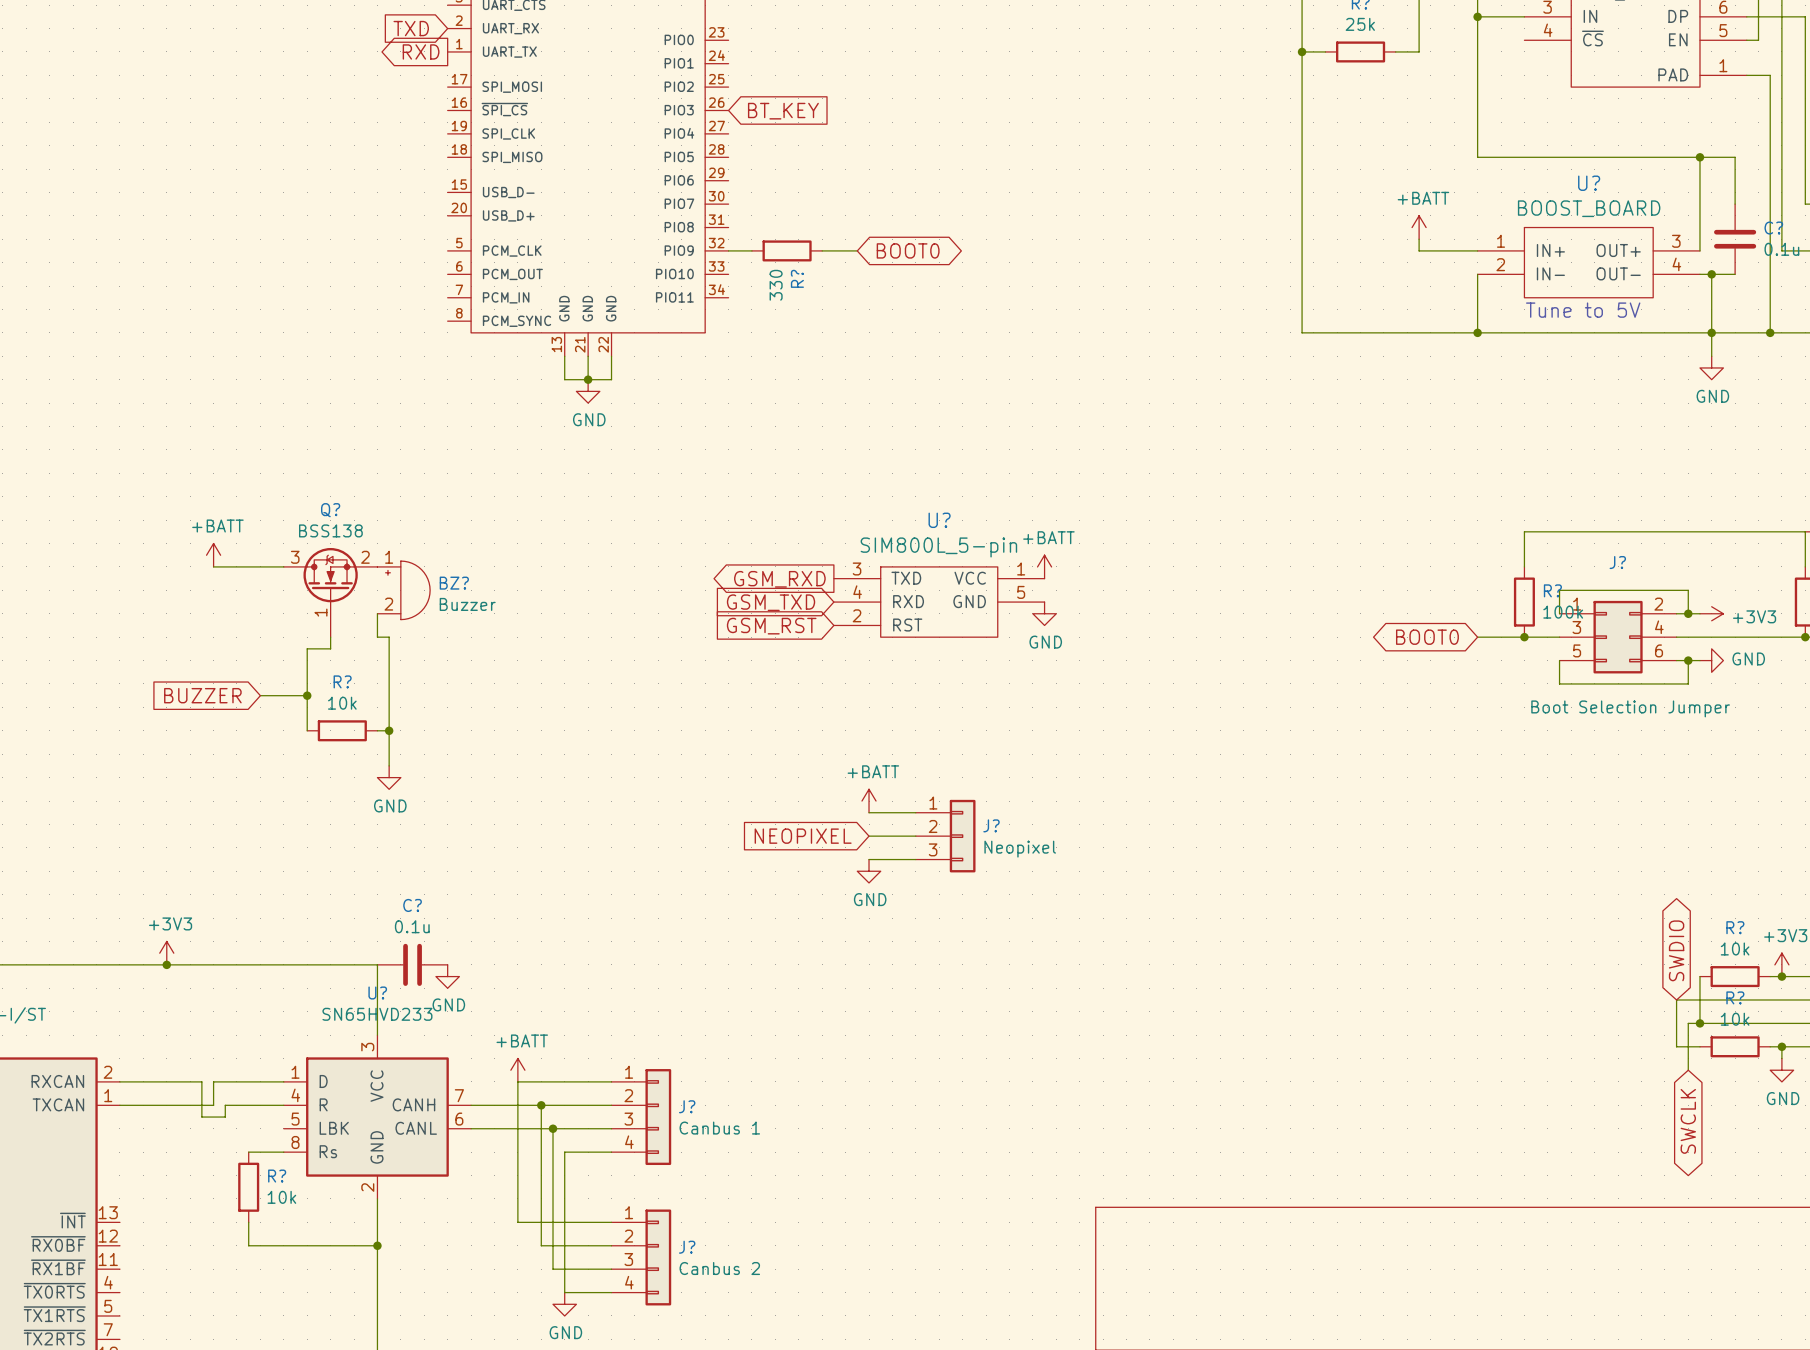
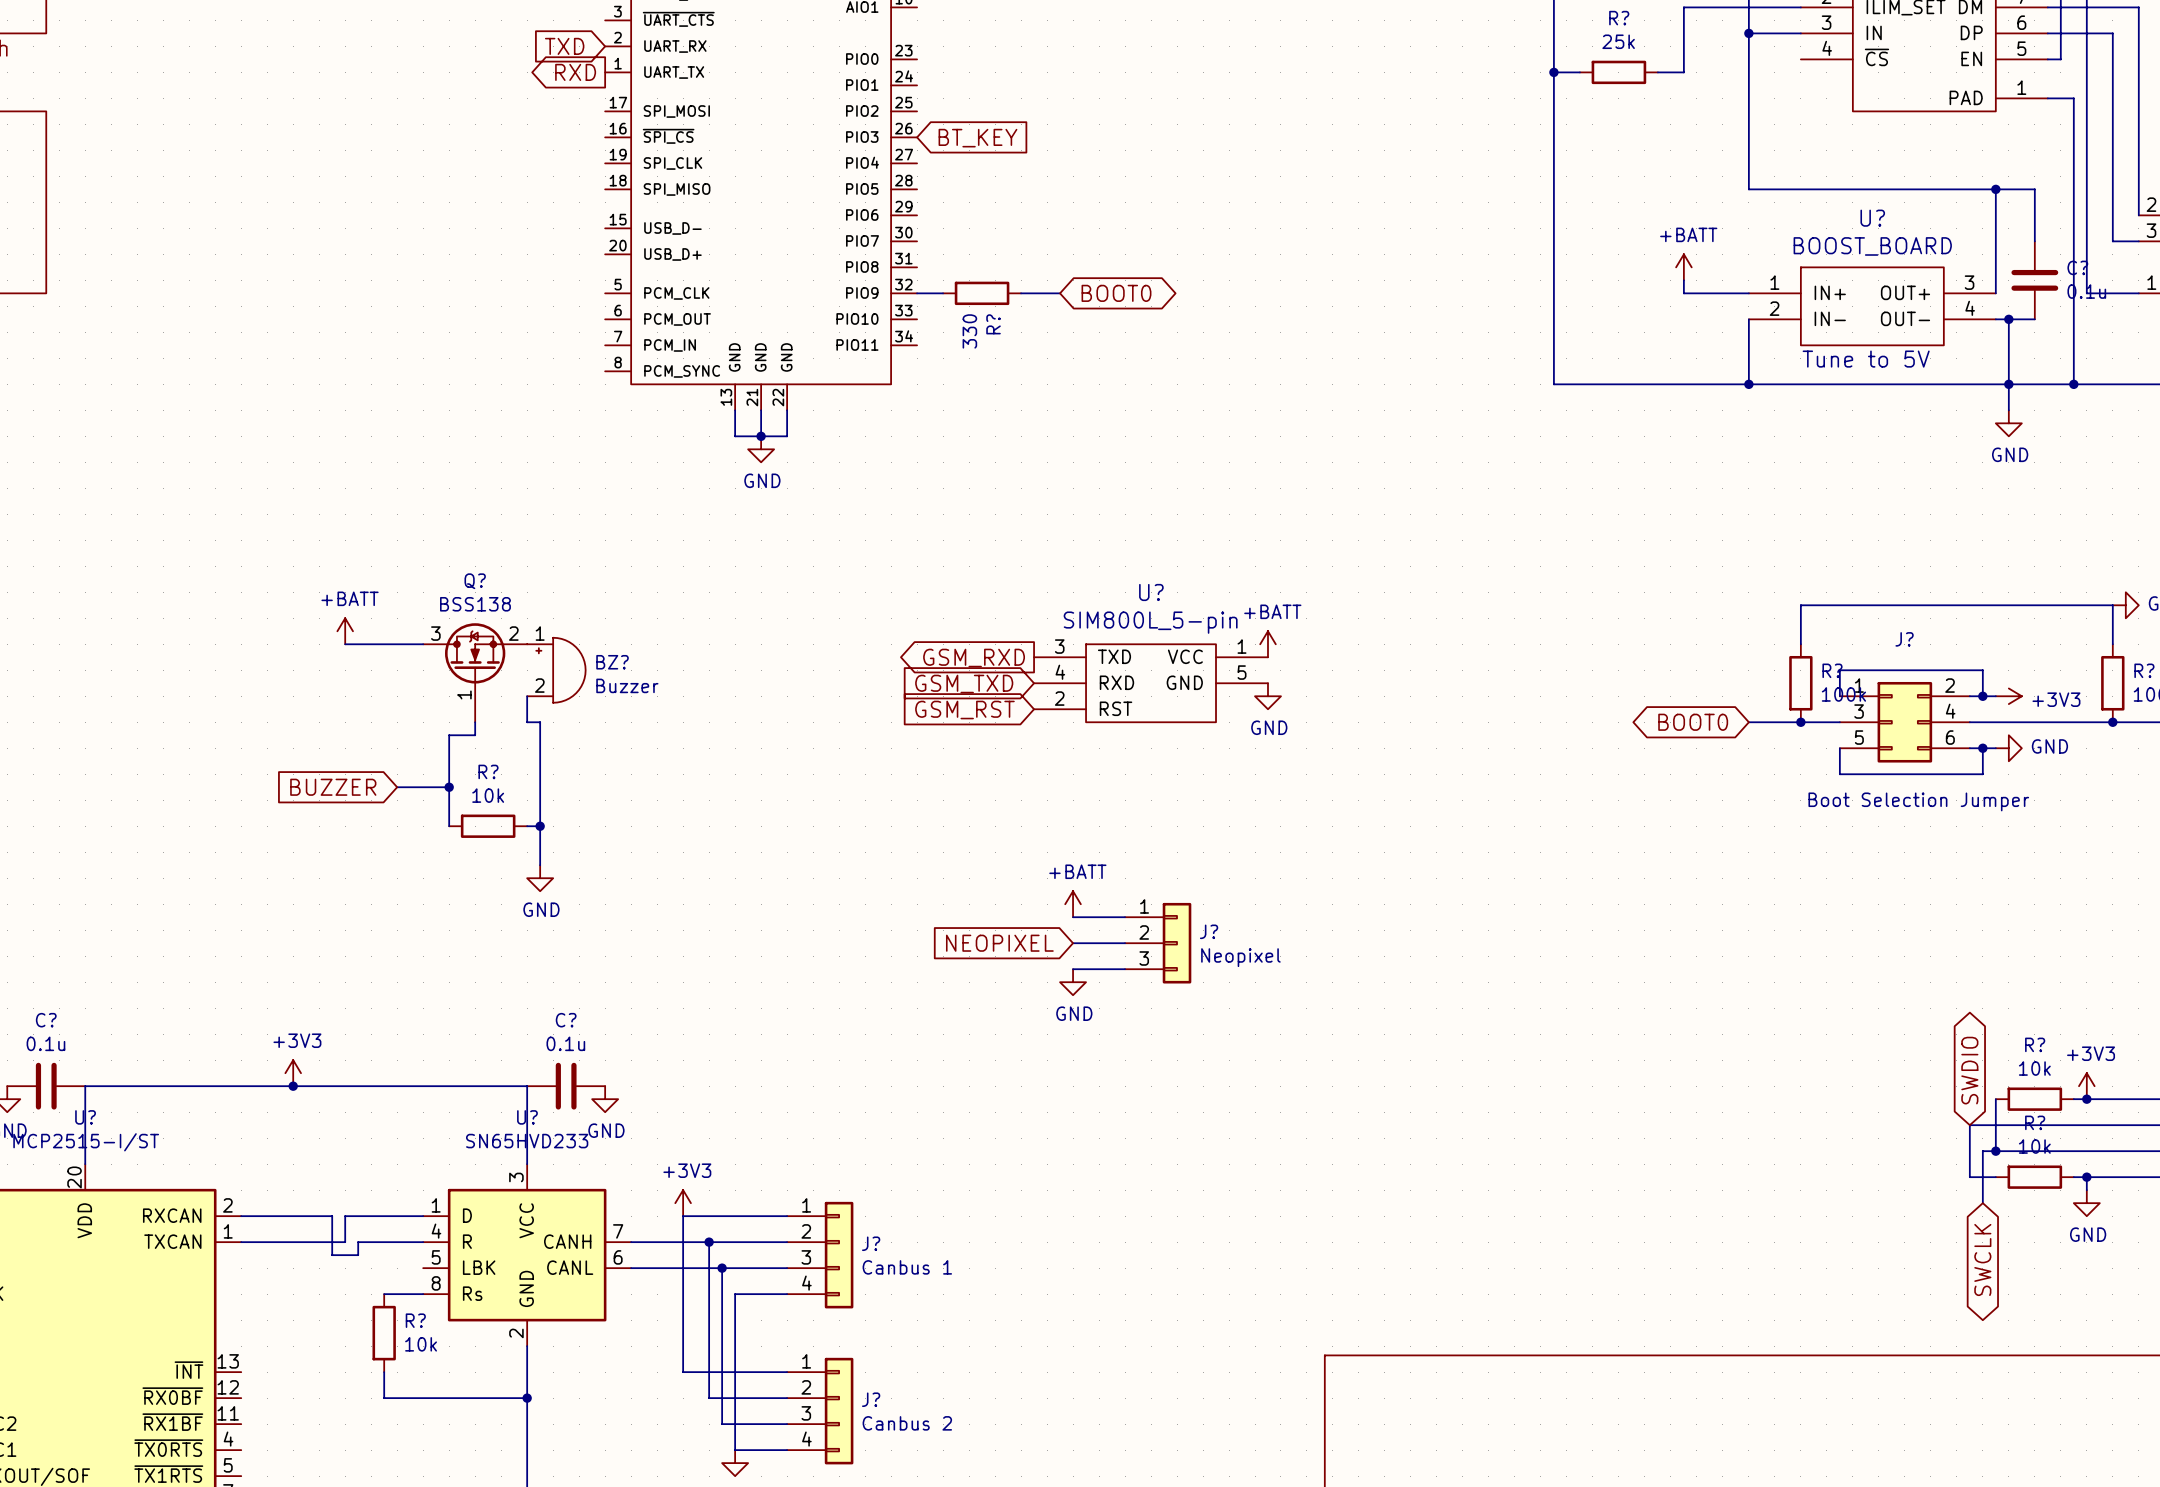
power symbol: +BATT (517, 1070) -> +3V3 (683, 1203)

